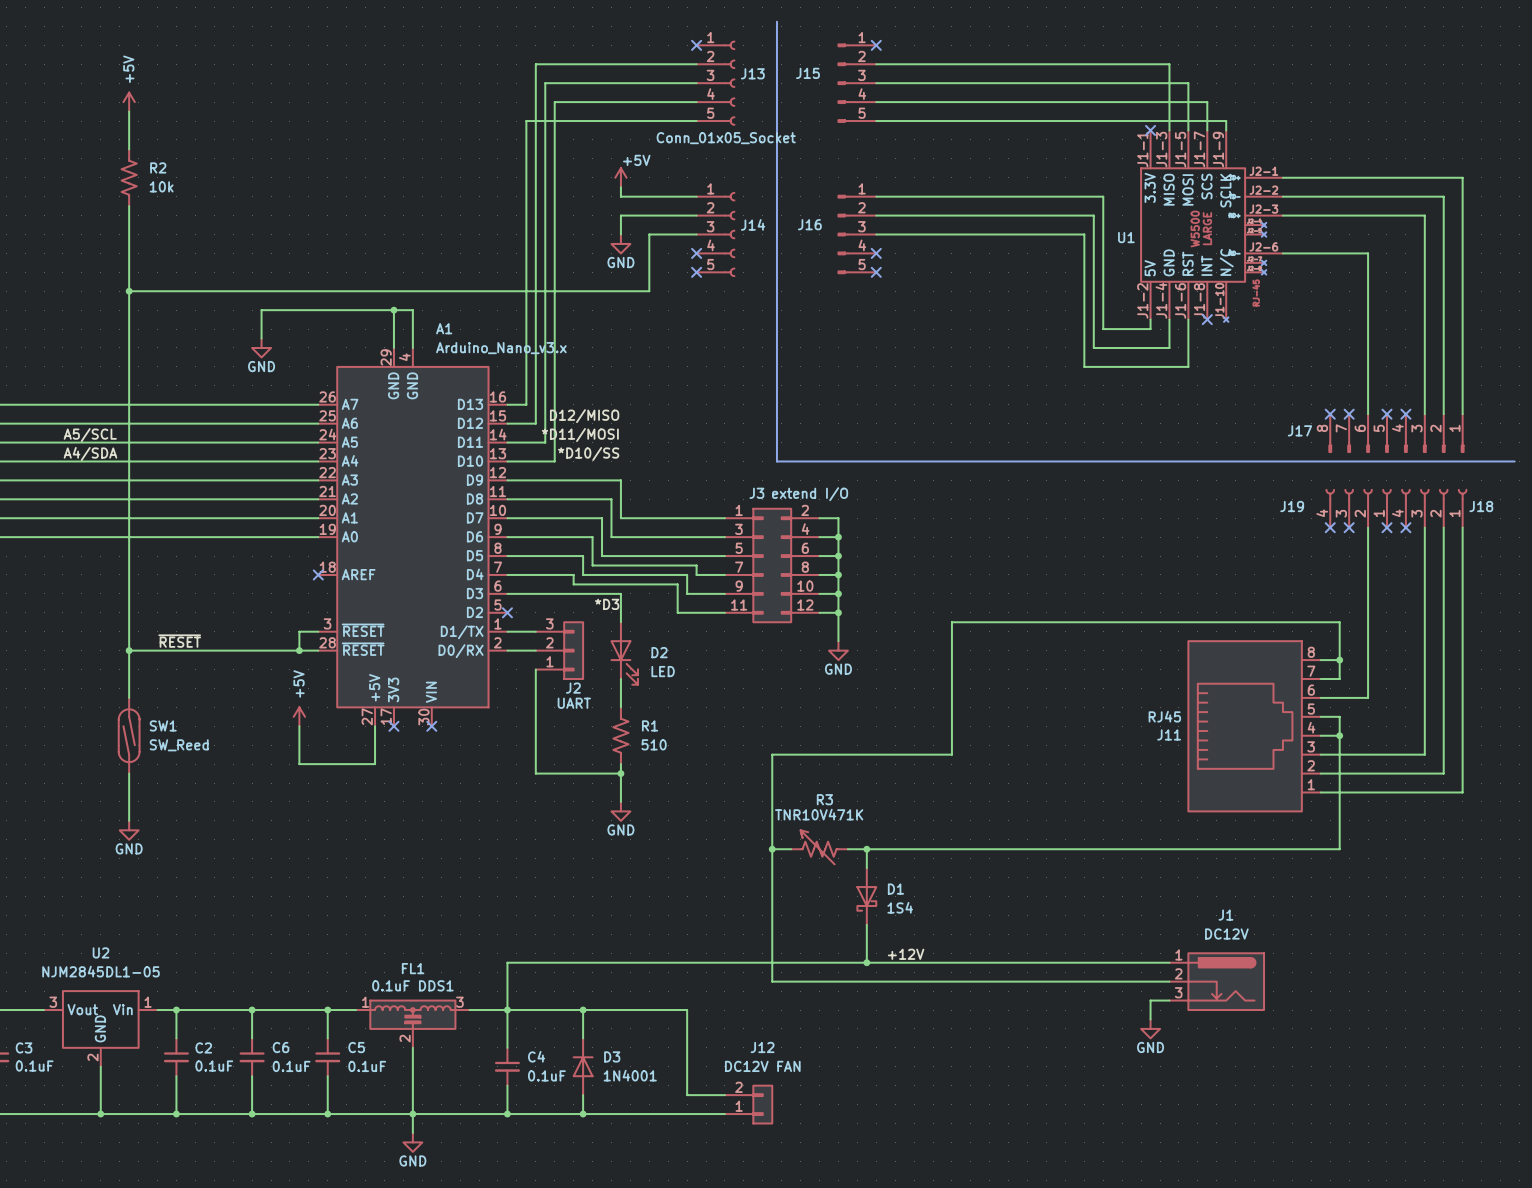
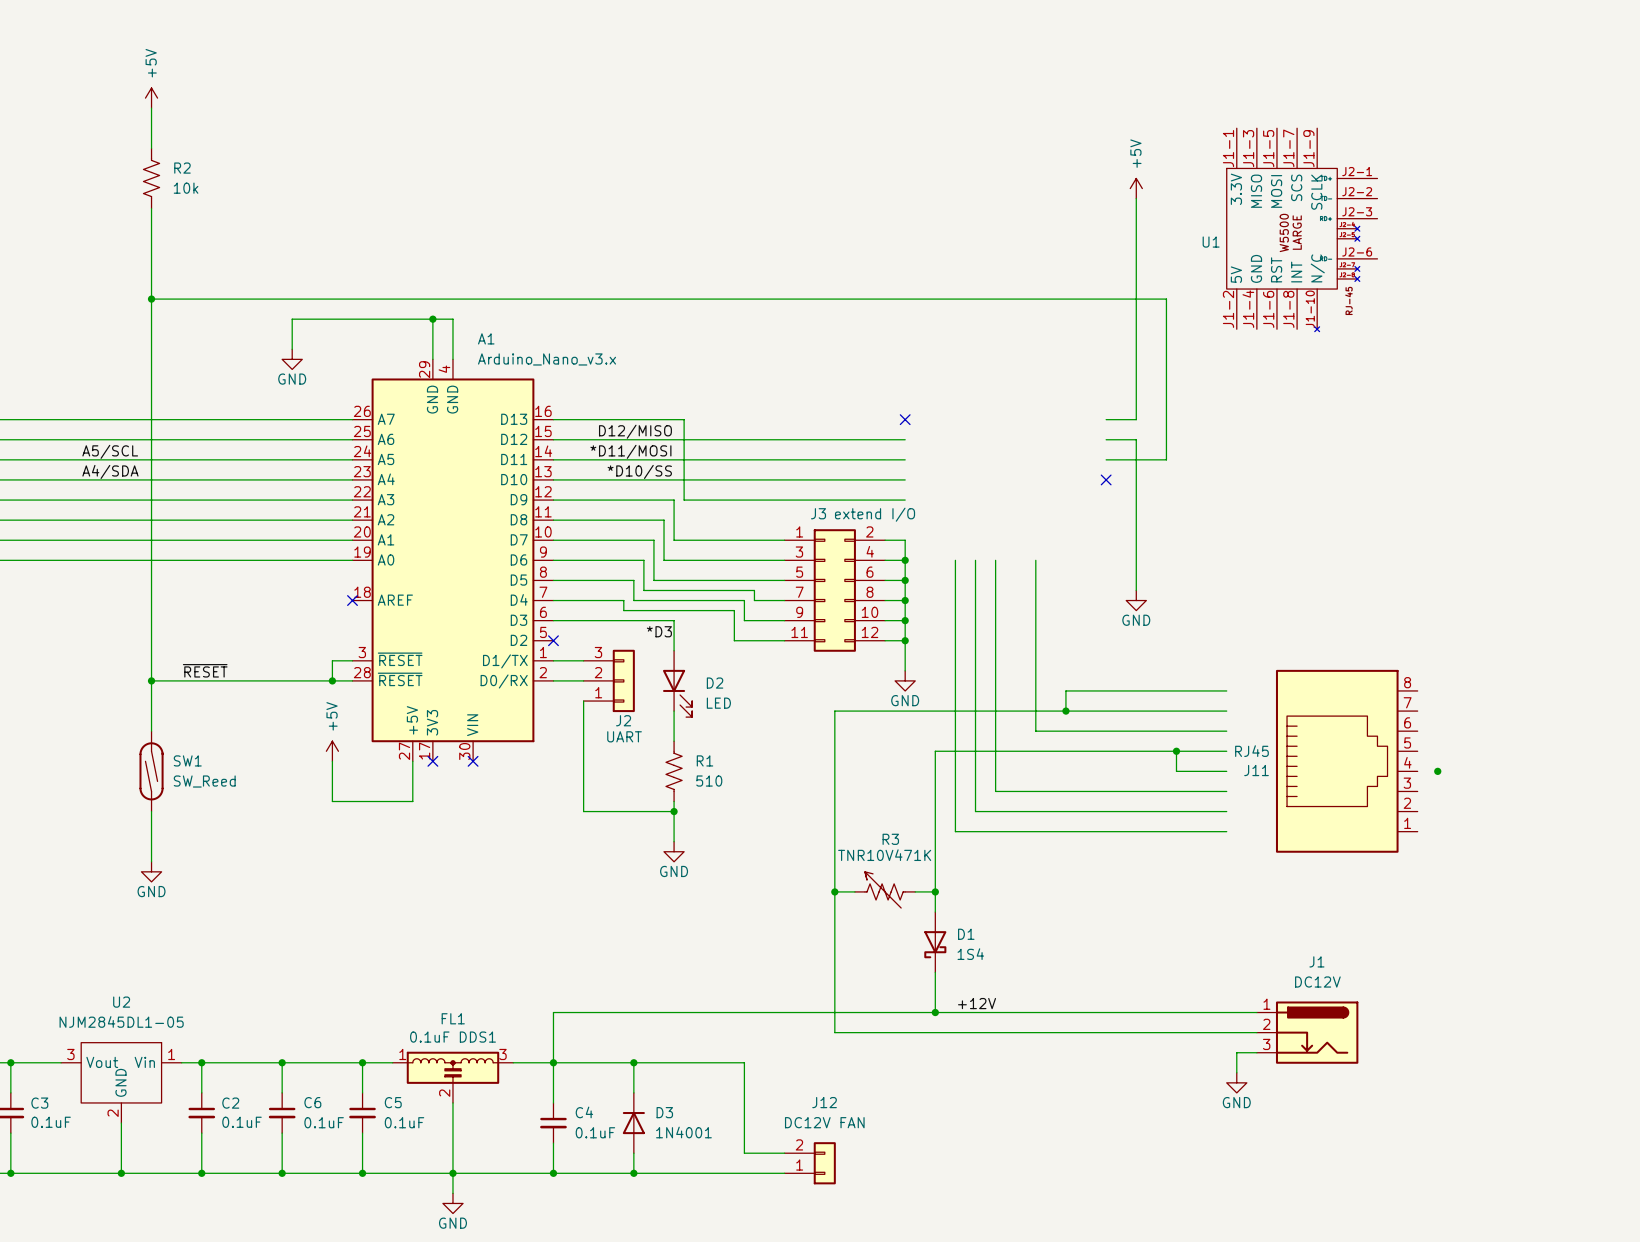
line: (776, 21) (776, 461) (1514, 461) -> none
no-connect mark: (696, 45) -> none
no-connect mark: (876, 45) -> none
wire: (696, 64) (535, 64) (535, 423) -> (905, 439) (583, 439)
wire: (876, 64) (1169, 64) (1169, 130) -> none
wire: (696, 83) (545, 83) (545, 442) -> (905, 459) (593, 459)
J13: Conn_01x05_Socket (715, 83) -> none
J15: (857, 83) -> none
wire: (876, 83) (1188, 83) (1188, 130) -> none
wire: (696, 102) (554, 102) (554, 461) -> (905, 479) (603, 479)
wire: (876, 102) (1207, 102) (1207, 130) -> none
wire: (696, 121) (526, 121) (526, 404) -> (905, 500) (684, 500) (684, 419) (573, 419)
wire: (876, 121) (1226, 121) (1226, 130) -> none
no-connect mark: (1150, 130) -> none
power symbol: +5V (620, 177) -> none
wire: (1282, 177) (1462, 177) (1462, 414) -> none
wire: (620, 187) (620, 196) (696, 196) -> none
power symbol: none -> +5V (1136, 188)
wire: (876, 196) (1103, 196) (1103, 329) (1150, 329) (1150, 319) -> none
wire: none -> (1136, 198) (1136, 419) (1106, 419)
wire: (1282, 196) (1443, 196) (1443, 414) -> none
wire: (696, 215) (620, 215) (620, 234) -> none
wire: (876, 215) (1093, 215) (1093, 347) (1169, 347) (1169, 319) -> none
wire: (1282, 215) (1424, 215) (1424, 414) -> none
wire: (696, 234) (649, 234) (649, 291) -> none
J14: (715, 234) -> none
J16: (857, 234) -> none
wire: (876, 234) (1084, 234) (1084, 291) -> (704, 299) (1166, 299)
power symbol: GND (620, 243) -> none
no-connect mark: (696, 253) -> none
no-connect mark: (876, 253) -> none
wire: (1282, 253) (1368, 253) (1368, 414) -> none
no-connect mark: (696, 272) -> none
no-connect mark: (876, 272) -> none
wire: (1188, 319) (1188, 366) (1084, 366) -> (1106, 459) (1166, 459) (1166, 379)
no-connect mark: (1207, 319) -> none
no-connect mark: none -> (905, 419)
no-connect mark: (1330, 414) -> none
no-connect mark: (1349, 414) -> none
no-connect mark: (1386, 414) -> none
no-connect mark: (1405, 414) -> none
wire: none -> (1106, 439) (1136, 439) (1136, 590)
J17: (1396, 433) -> none
no-connect mark: none -> (1106, 479)
J19: (1358, 508) -> none
J18: (1434, 508) -> none
no-connect mark: (1330, 527) -> none
no-connect mark: (1349, 527) -> none
wire: (1368, 527) (1368, 697) (1320, 697) -> none
no-connect mark: (1386, 527) -> none
no-connect mark: (1405, 527) -> none
wire: (1424, 527) (1424, 754) (1320, 754) -> none
wire: (1443, 527) (1443, 773) (1320, 773) -> none
wire: (1462, 527) (1462, 792) (1320, 792) -> none
wire: none -> (955, 560) (955, 831) (1226, 831)
wire: none -> (975, 560) (975, 811) (1226, 811)
wire: none -> (995, 560) (995, 791)
wire: none -> (1035, 560) (1035, 731) (1226, 731)
power symbol: none -> GND (1136, 600)
wire: none -> (1226, 690) (1065, 690) (1065, 711)
wire: (1320, 660) (1339, 660) -> none
junction: (1339, 660) -> none
junction: none -> (1065, 711)
wire: (1320, 679) (1339, 679) (1339, 622) (951, 622) (951, 754) -> (1226, 791) (1025, 791)
wire: none -> (1176, 751) (1176, 771) (1226, 771)
junction: none -> (1176, 751)
wire: (1320, 716) (1339, 716) (1339, 849) (866, 849) -> (1226, 751) (935, 751) (935, 891)
wire: (1320, 735) (1339, 735) -> none
wire: (772, 754) (923, 754) -> (834, 791) (834, 711) (1226, 711)

